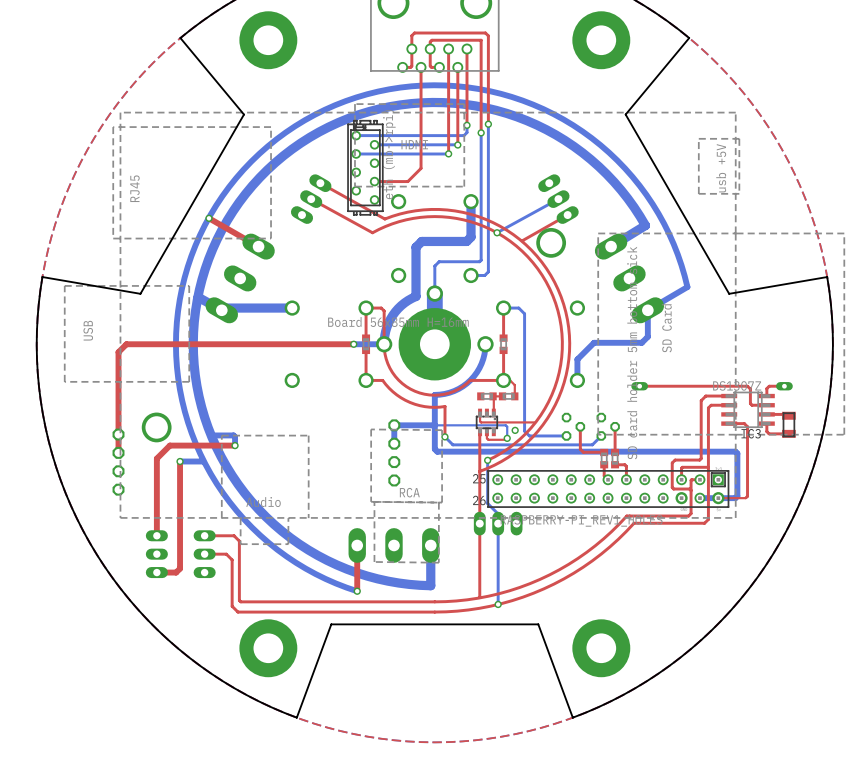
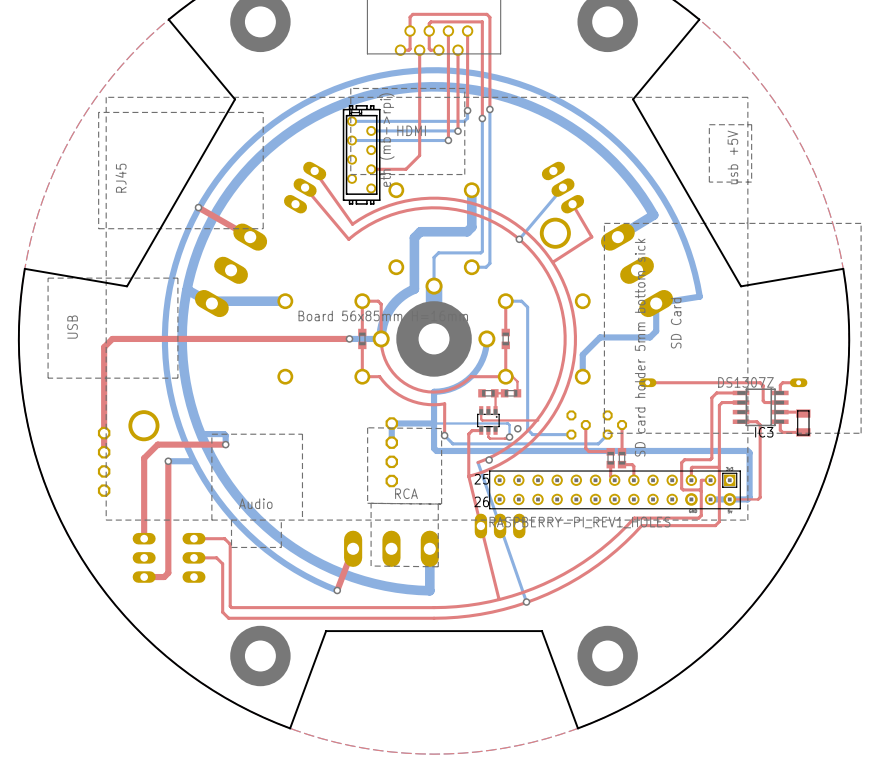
top track: (320, 183) (384, 219) (407, 212) (439, 209) (462, 212) (485, 219) (506, 230) (525, 244) (541, 262) (554, 282) (563, 304) (569, 335) (567, 367) (561, 390) (547, 418) (532, 437) (508, 457) (479, 471) -> (314, 170) (352, 224) (381, 208) (405, 201) (429, 198) (462, 201) (493, 211) (522, 228) (545, 252) (558, 272) (570, 303) (575, 327) (573, 360) (565, 392) (549, 421) (526, 446) (499, 464) (468, 476)
top track: (311, 199) (372, 232) (399, 221) (420, 217) (449, 217) (477, 223) (497, 232) (516, 246) (542, 275) (552, 295) (561, 326) (562, 349) (557, 380) (548, 401) (531, 427) (507, 448) (487, 460) -> (305, 187) (348, 239) (376, 221) (399, 212) (431, 207) (456, 209) (479, 216) (502, 226) (527, 247) (543, 266) (557, 295) (563, 319) (564, 352) (557, 384) (542, 413) (526, 432) (507, 447) (477, 462)
bottom track: (558, 199) (497, 232) -> (562, 187) (519, 239)
top track: (567, 215) (522, 240) -> (572, 204) (591, 237) (553, 261)
via position: (497, 232) -> (519, 239)
bottom track: (647, 310) (687, 287) (677, 254) (658, 213) (632, 176) (600, 145) (563, 119) (522, 100) (490, 91) (456, 86) (411, 86) (378, 91) (335, 105) (304, 120) (276, 139) (251, 161) (216, 205) (199, 235) (187, 266) (179, 299) (176, 333) (176, 367) (182, 400) (191, 433) (205, 464) (222, 493) (244, 519) (268, 542) (295, 562) (325, 578) (357, 591) -> (656, 303) (699, 296) (688, 251) (669, 208) (642, 169) (610, 135) (572, 108) (541, 92) (507, 80) (473, 73) (426, 70) (391, 73) (357, 81) (324, 93) (293, 109) (255, 137) (238, 154) (216, 181) (197, 210) (182, 242) (172, 276) (166, 311) (164, 346) (168, 381) (175, 415) (188, 448) (204, 479) (224, 508) (248, 534) (275, 556) (305, 575) (337, 590)
top track: (479, 432) (479, 597) -> (480, 430) (472, 430) (468, 434) (468, 476)
bottom track: (487, 460) (487, 503) (498, 513) (498, 603) -> none
bottom track: none -> (477, 462) (526, 602)
top track: none -> (468, 476) (499, 599)
top track: (357, 545) (357, 591) -> (353, 548) (337, 590)
via position: (357, 591) -> (337, 590)
via position: (498, 604) -> (526, 602)

